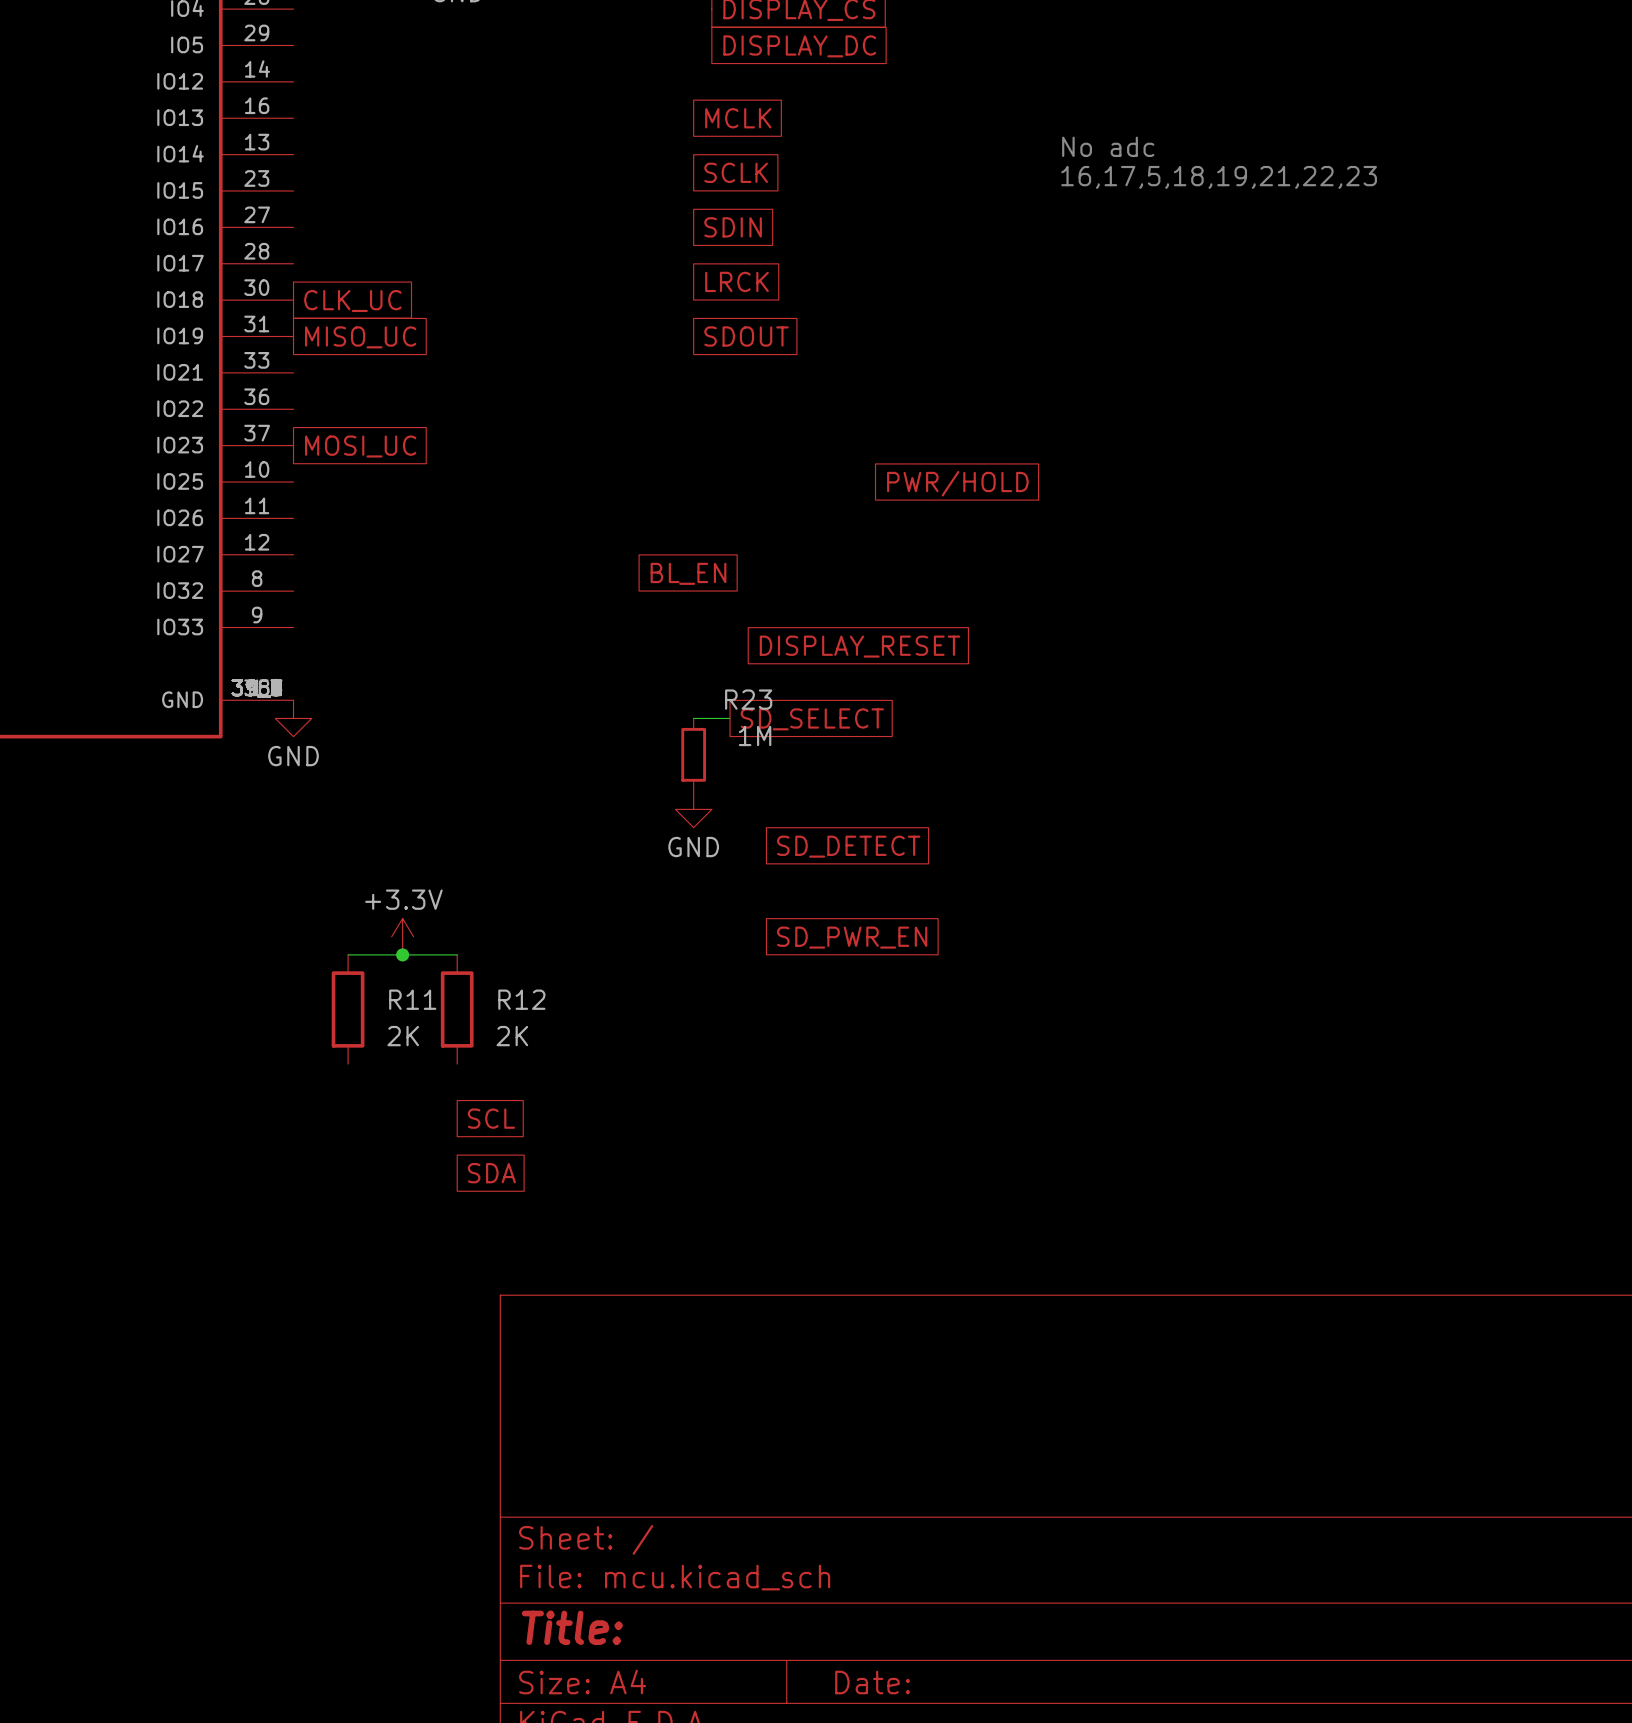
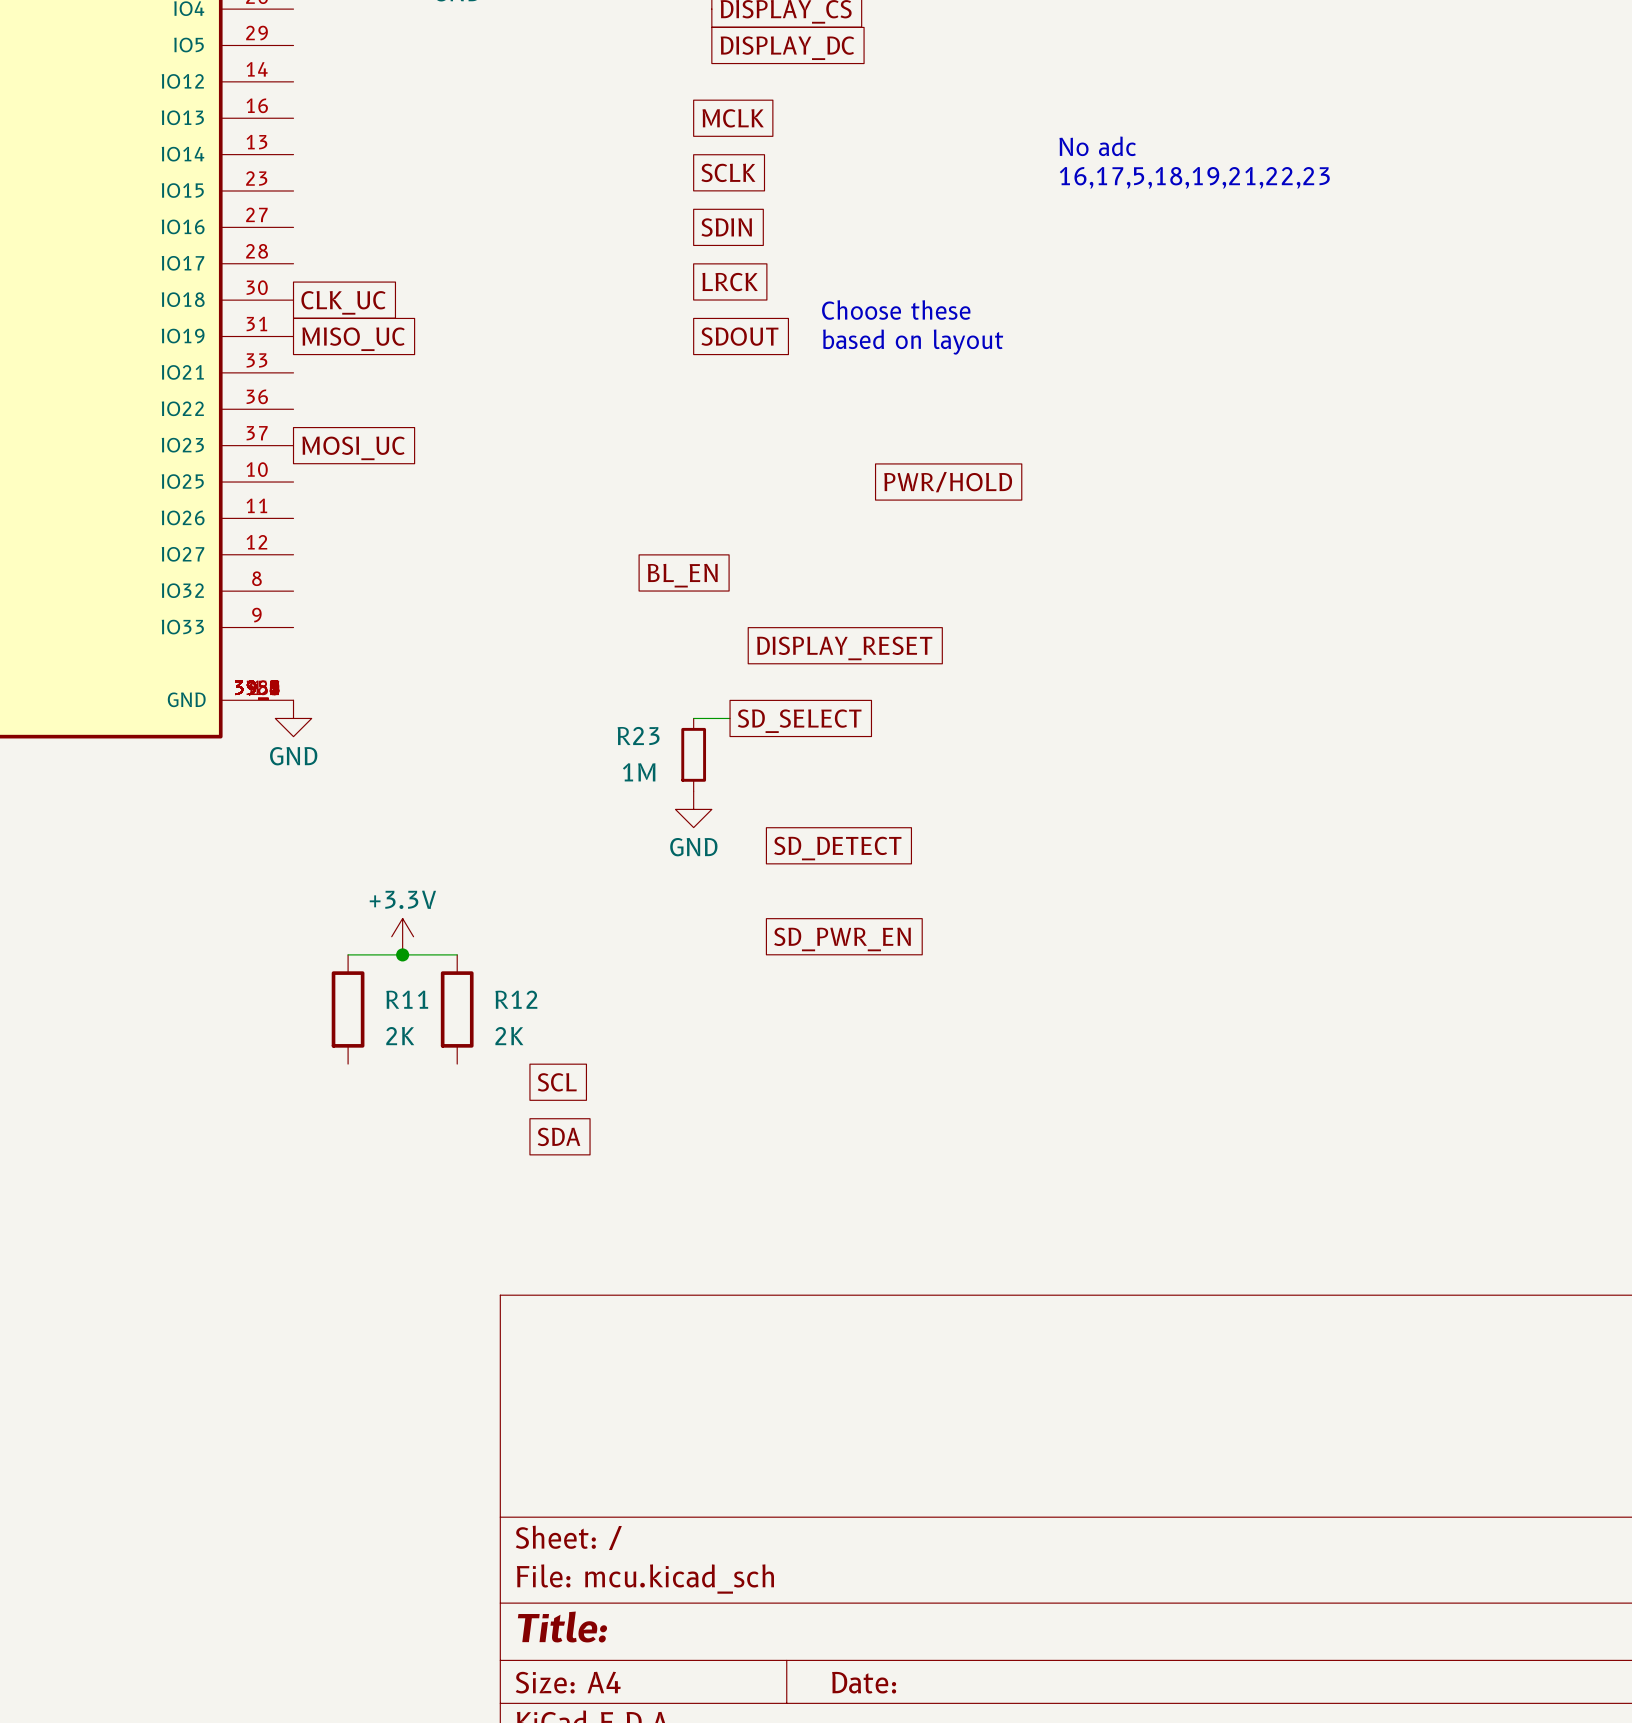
text: none -> Choose these (896, 310)
text: none -> based on layout (913, 342)
R23 name position: R23 (748, 699) -> R23 (638, 735)
R23 value position: 1M (755, 735) -> 1M (639, 772)
global label position: SCL (491, 1118) -> SCL (557, 1082)
global label position: SDA (491, 1173) -> SDA (559, 1136)

